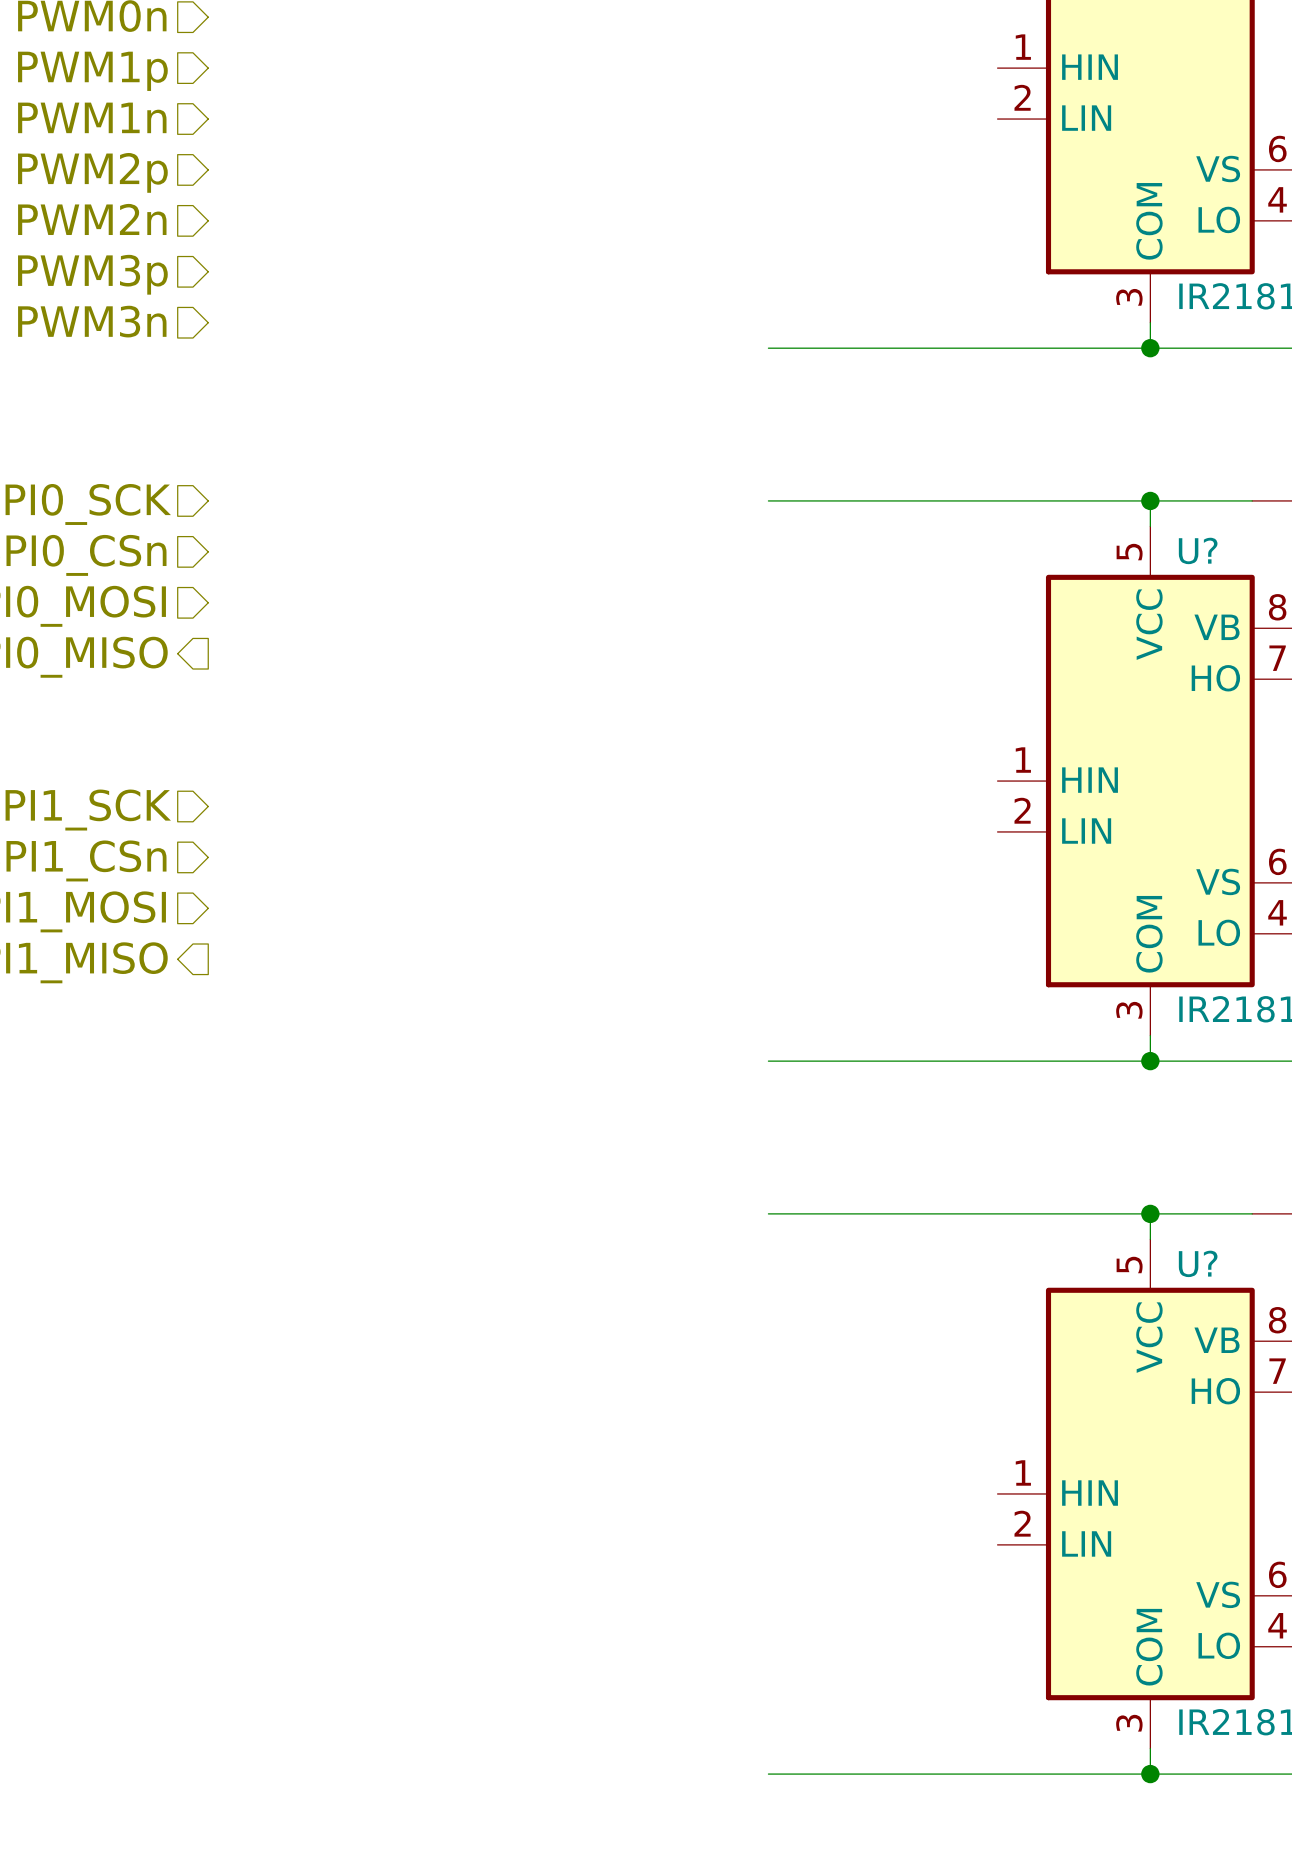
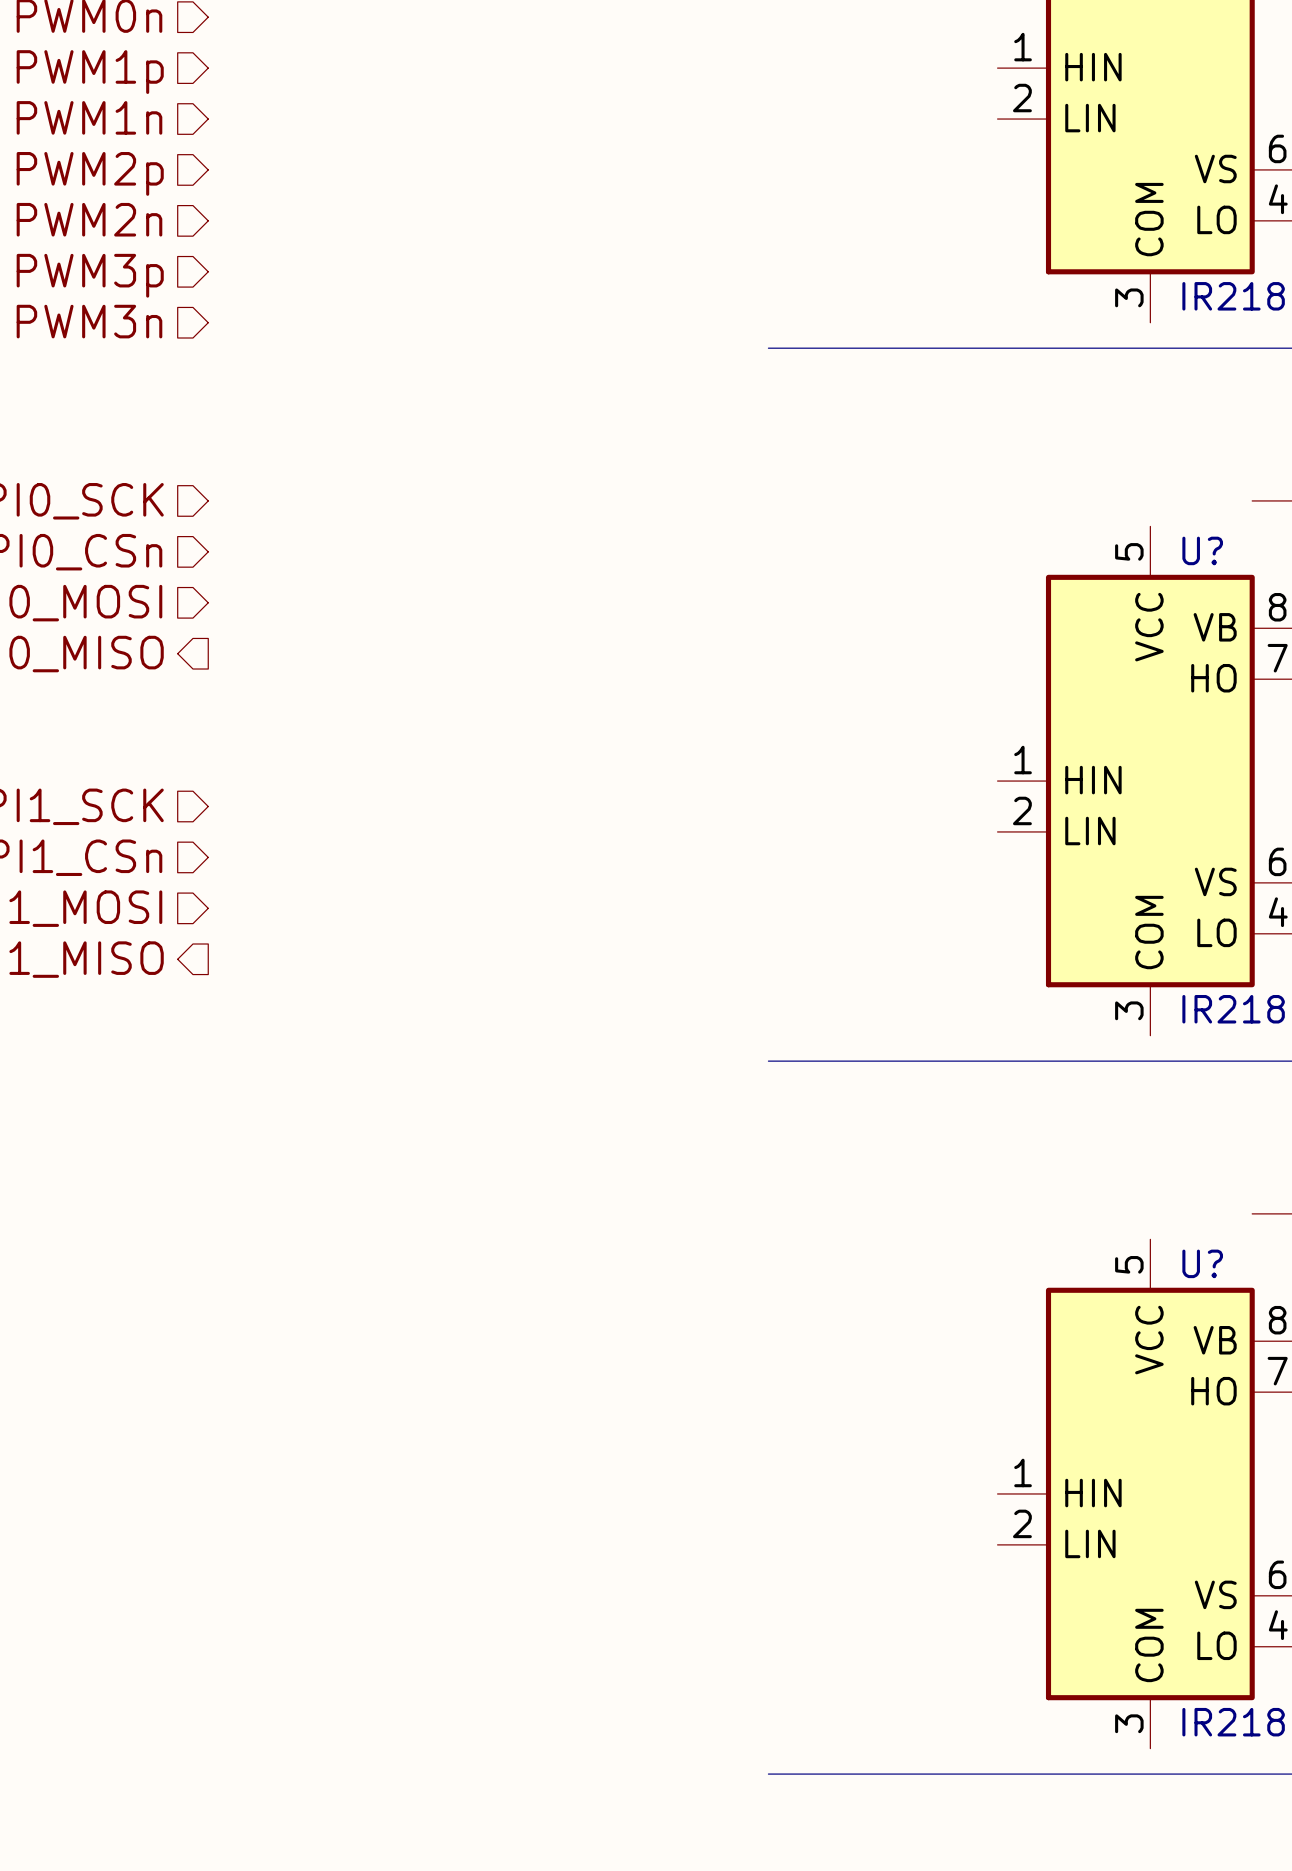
wire: (1150, 322) (1150, 348) -> none
junction: (1150, 348) -> none
wire: (768, 500) (1252, 500) -> none
wire: (1150, 500) (1150, 526) -> none
junction: (1150, 500) -> none
wire: (1150, 1035) (1150, 1061) -> none
junction: (1150, 1061) -> none
wire: (768, 1213) (1252, 1213) -> none
wire: (1150, 1213) (1150, 1239) -> none
junction: (1150, 1213) -> none
wire: (1150, 1748) (1150, 1774) -> none
junction: (1150, 1774) -> none

